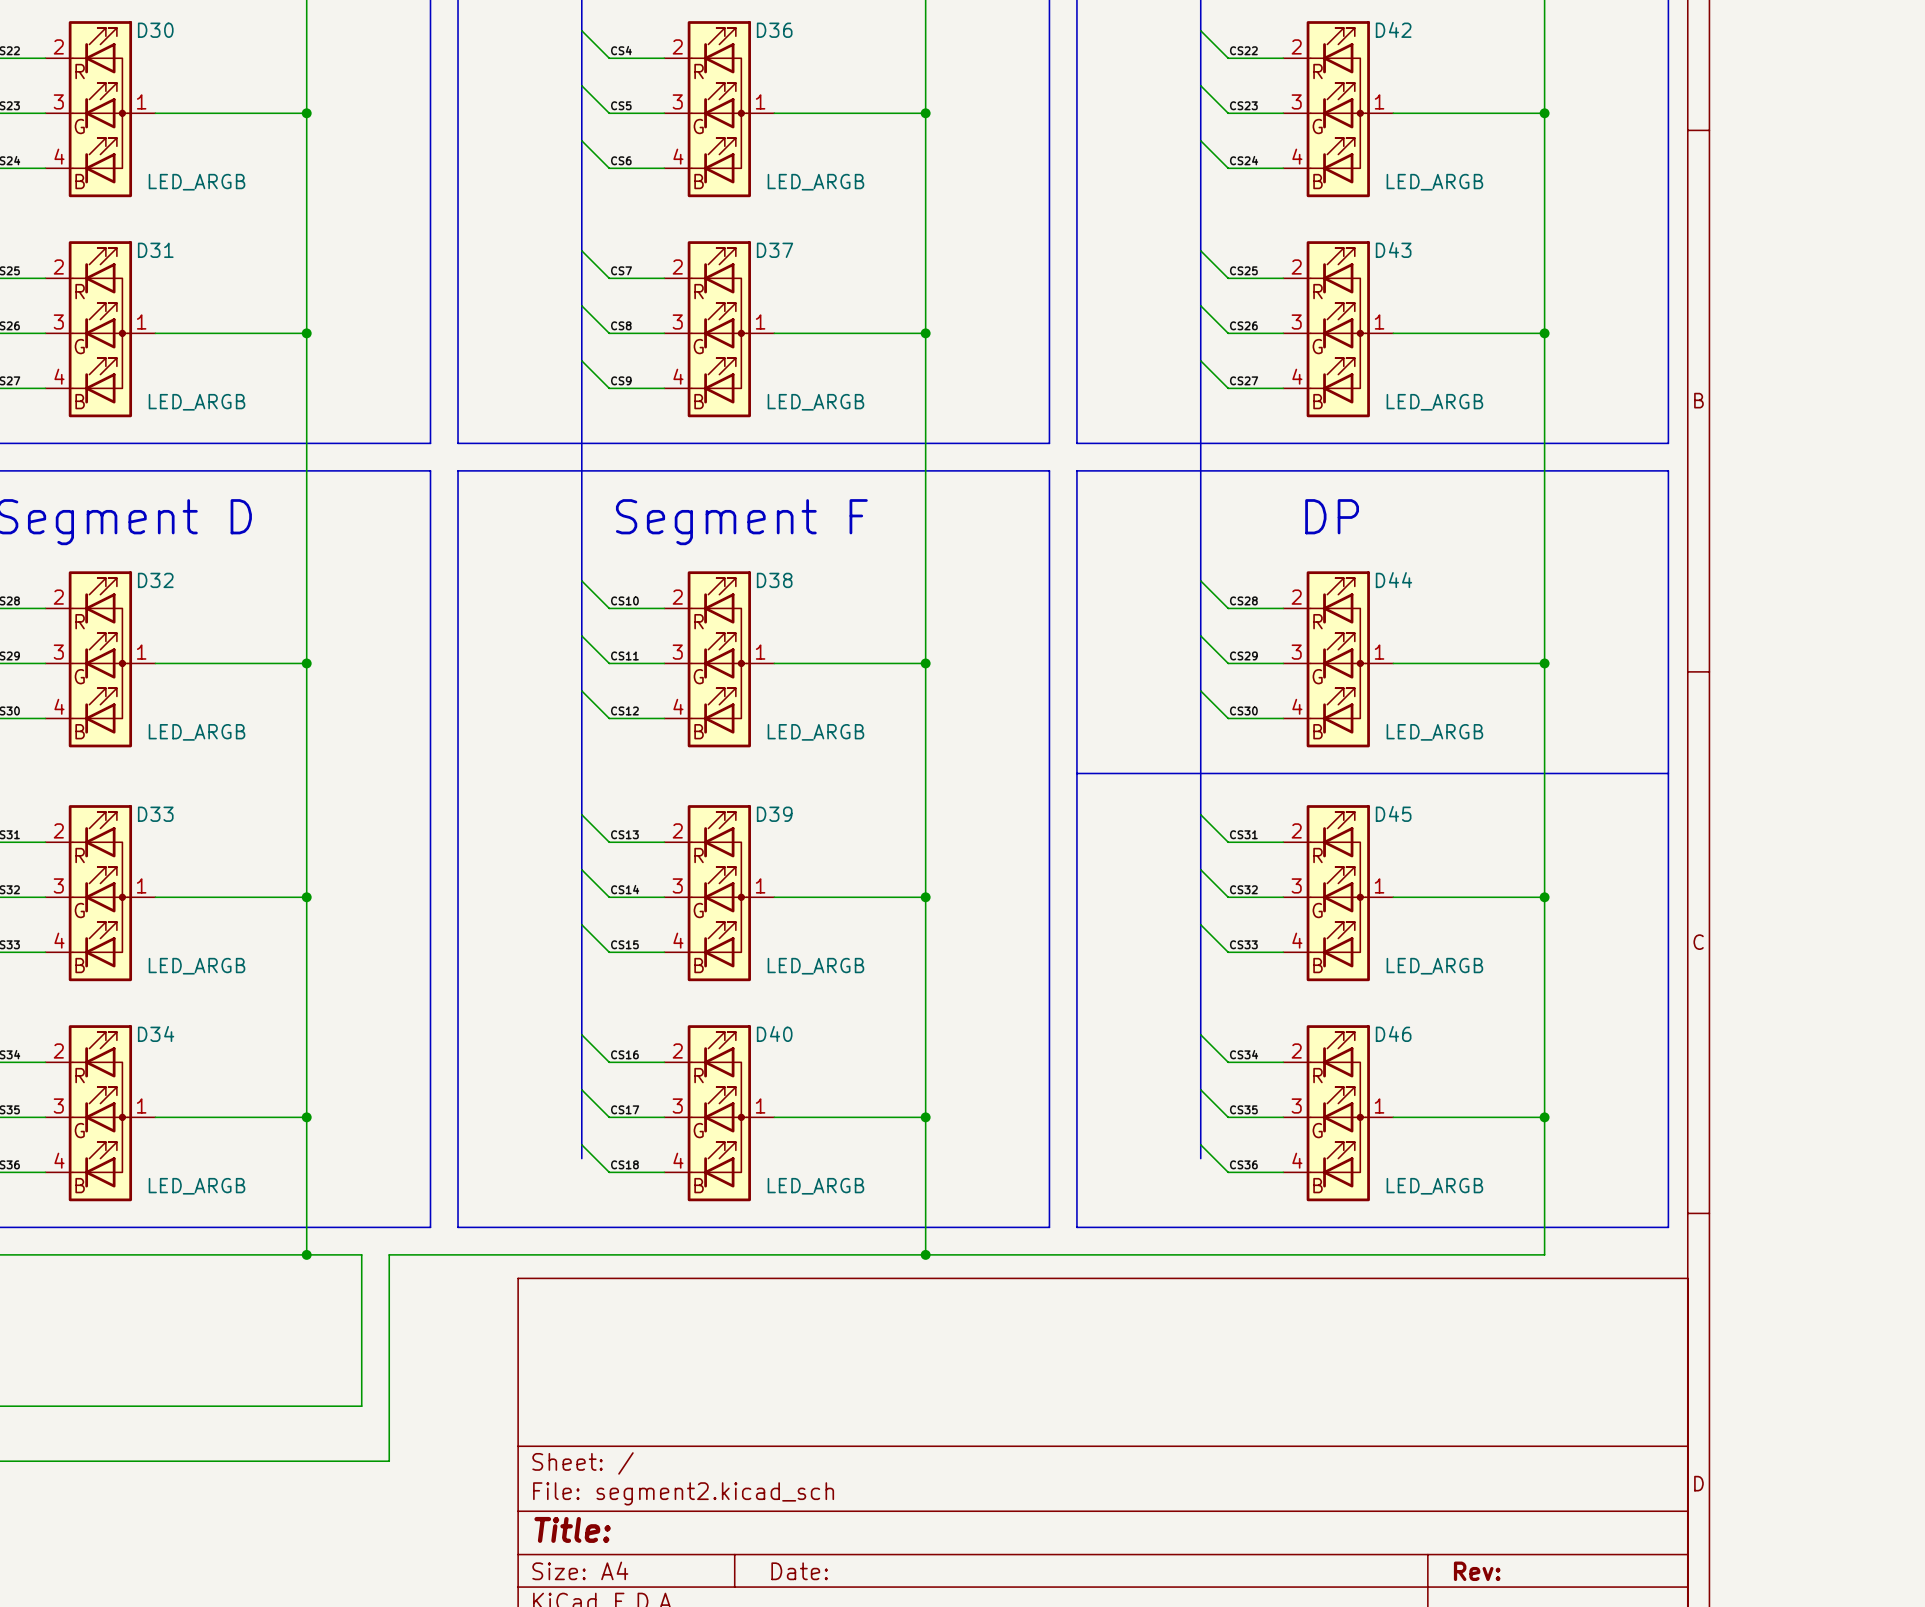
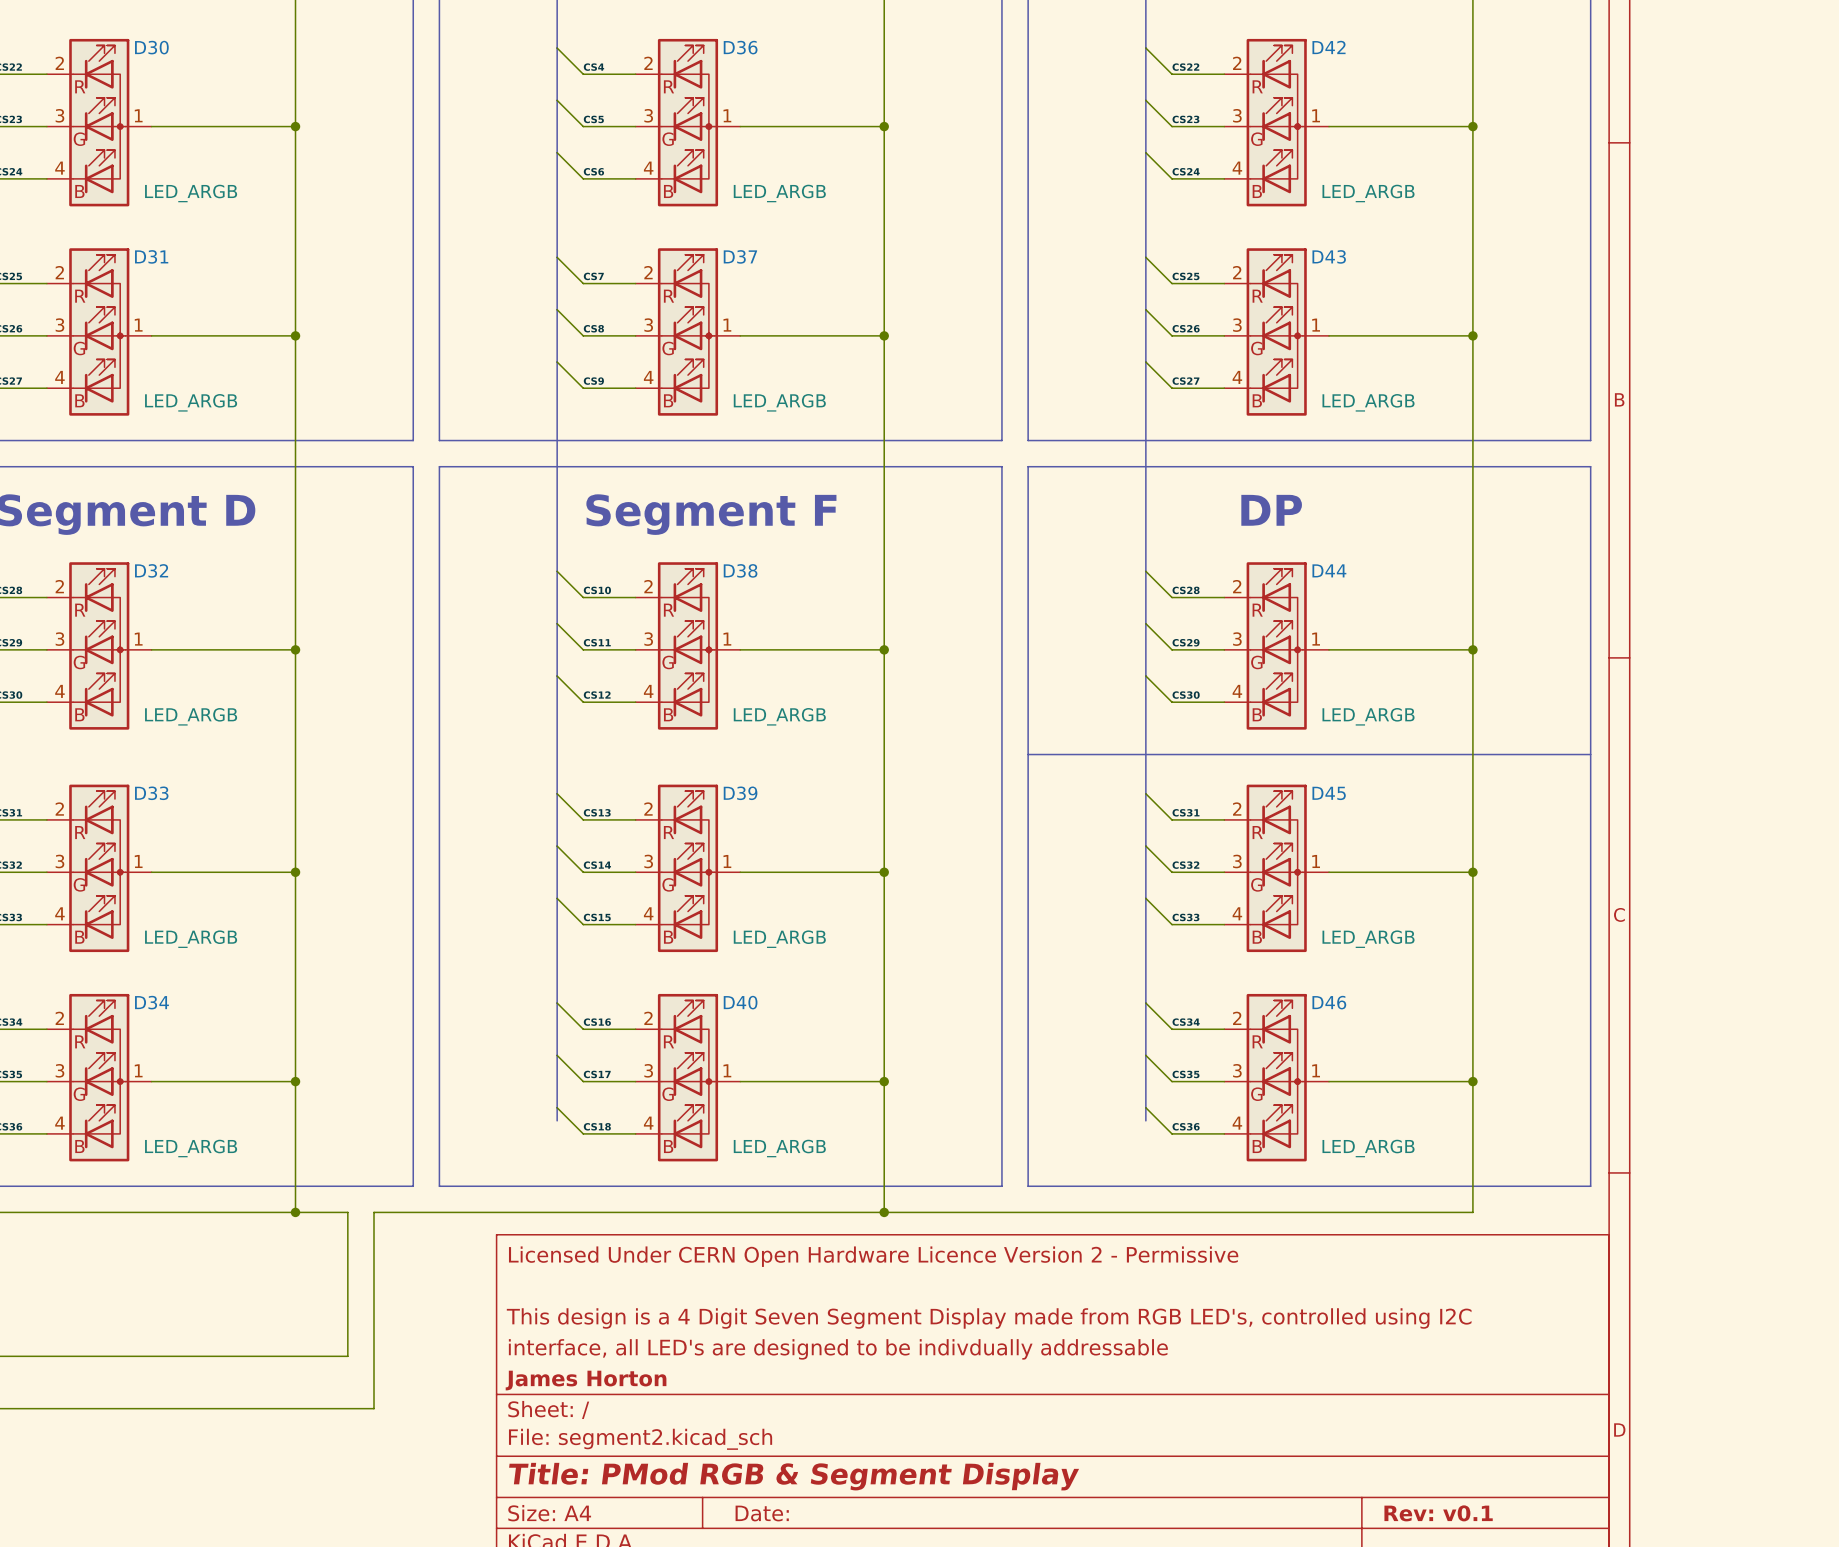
title block: none -> Licensed Under CERN Open Hardware Licence Version 2 - Permissive (873, 1256)
title block: none -> This design is a 4 Digit Seven Segment Display made from RGB LED's, controlled using I2C (989, 1318)
title block: none -> interface, all LED's are designed to be indivdually addressable (838, 1349)
title block: none -> James Horton (586, 1380)
title block: Title: (572, 1529) -> Title: PMod RGB & Segment Display (794, 1476)
title block: Rev: (1477, 1571) -> Rev: v0.1 (1438, 1513)

